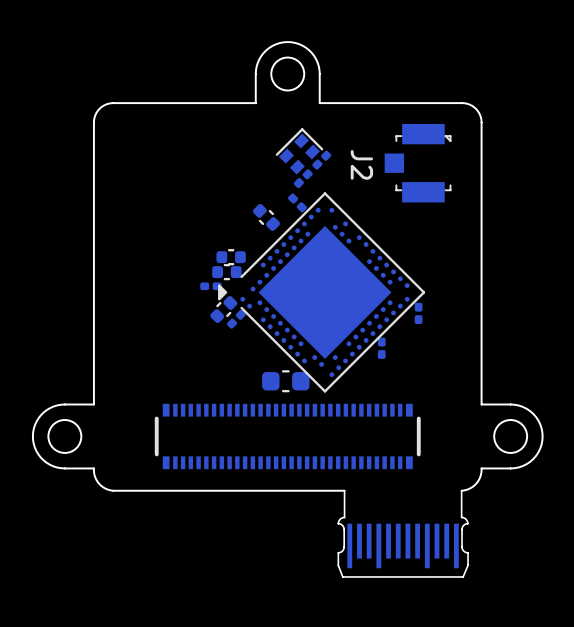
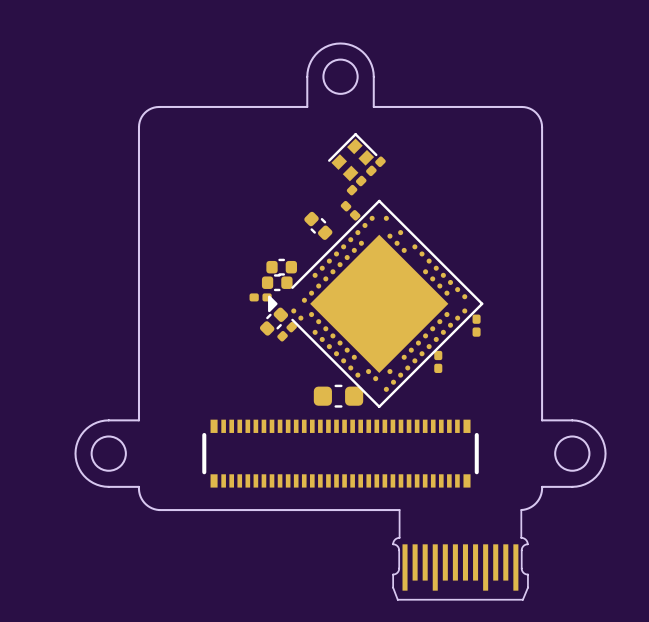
J2: (418, 163) -> none

